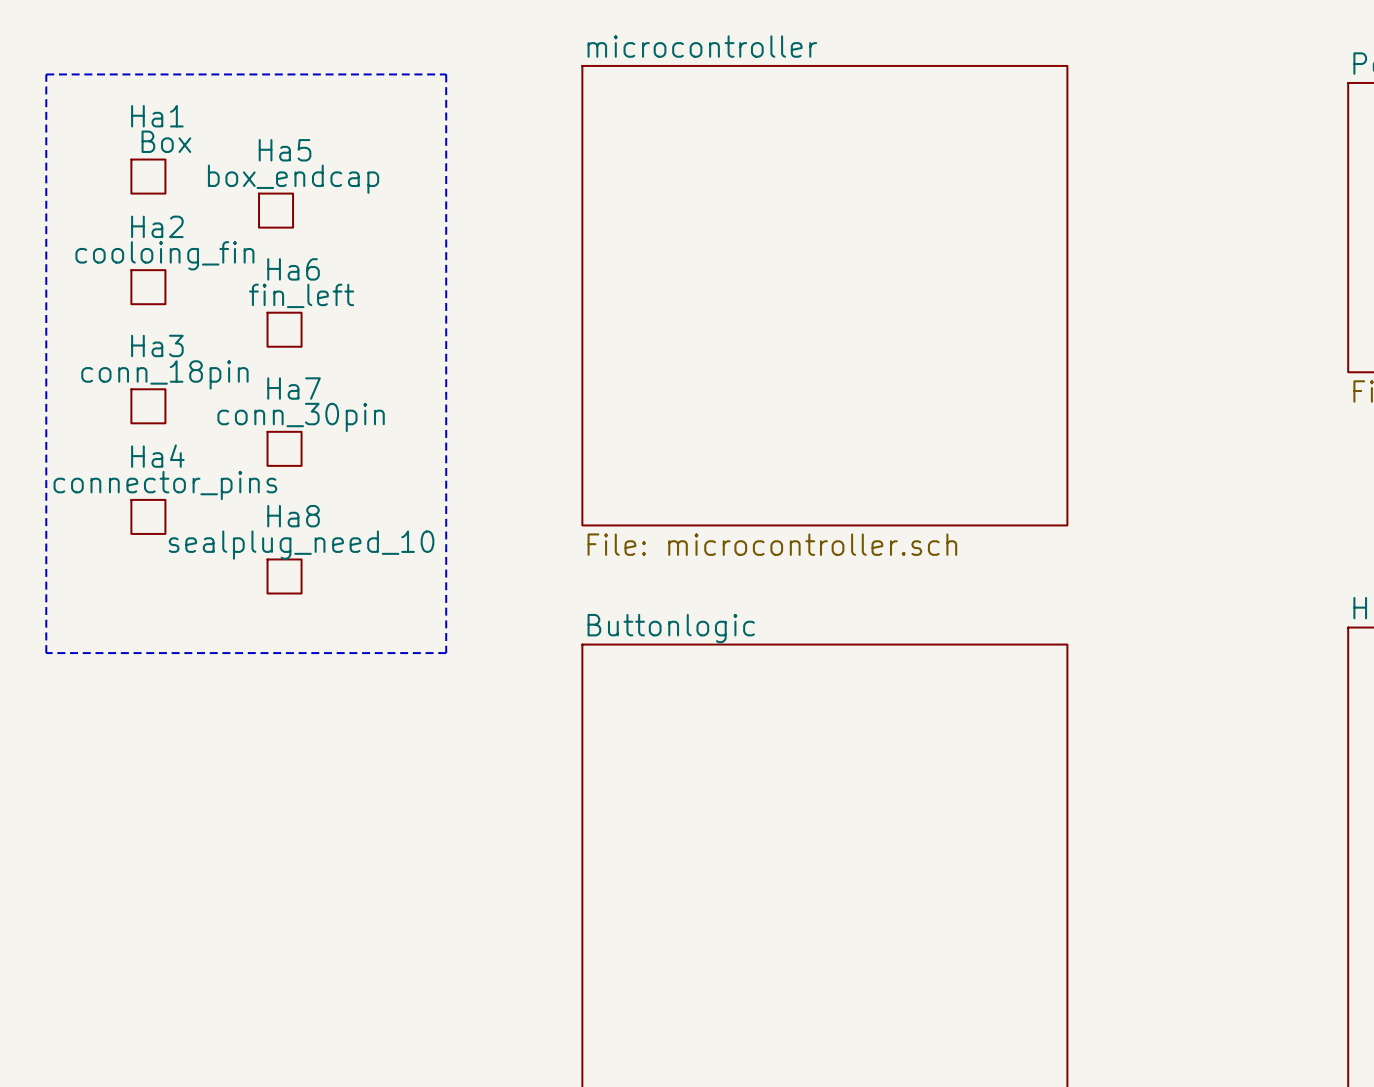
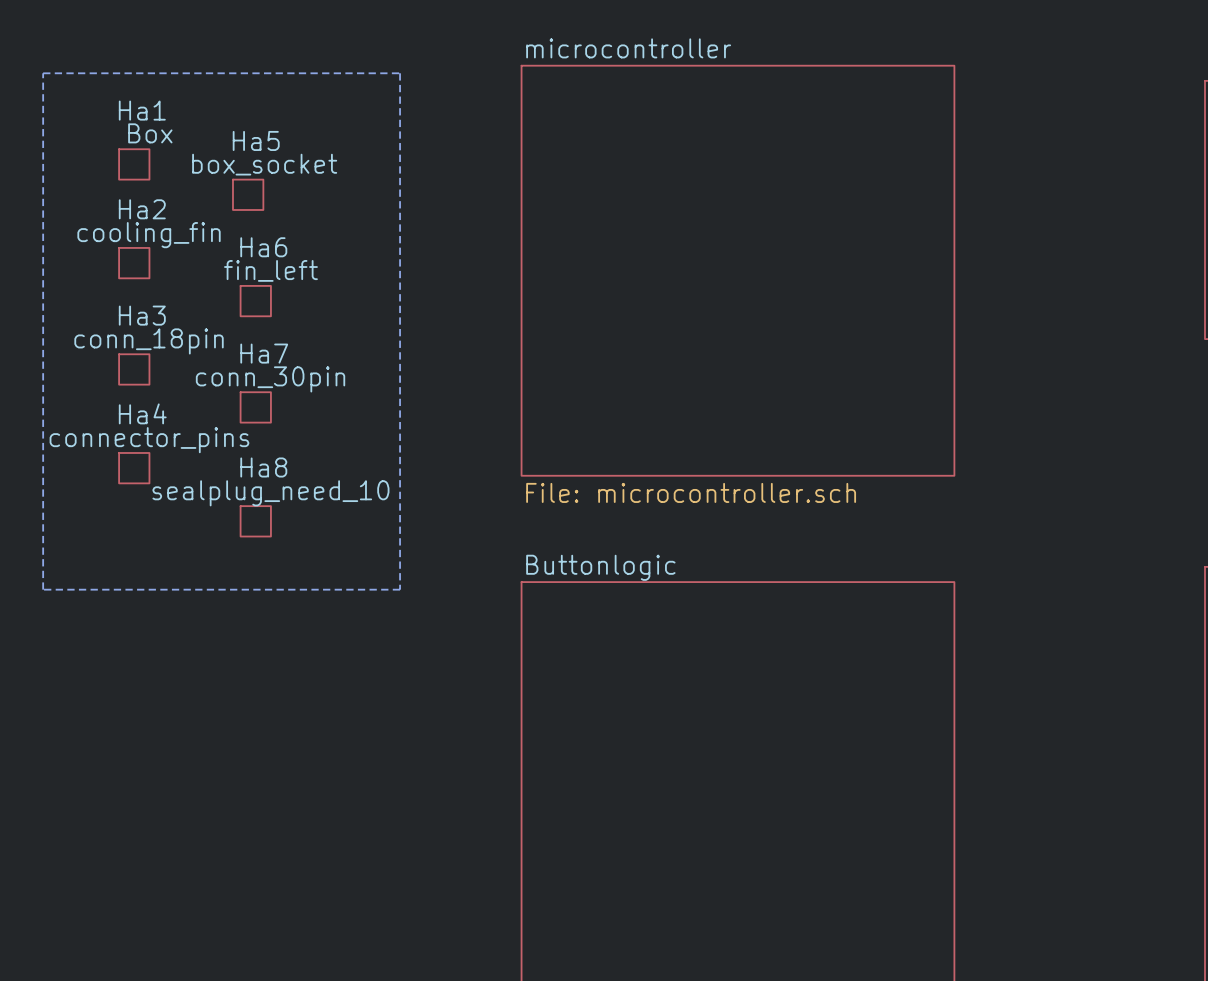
Ha5 value: box_endcap (293, 179) -> box_socket (264, 164)
Ha2 value: cooloing_fin (164, 255) -> cooling_fin (149, 235)

